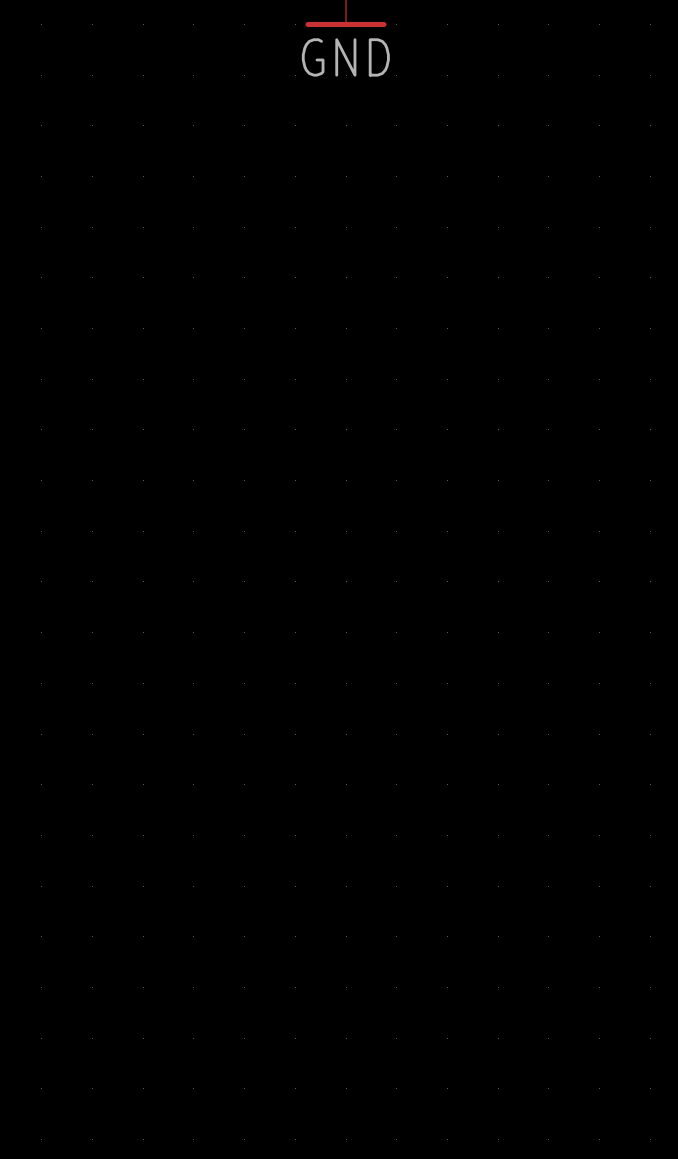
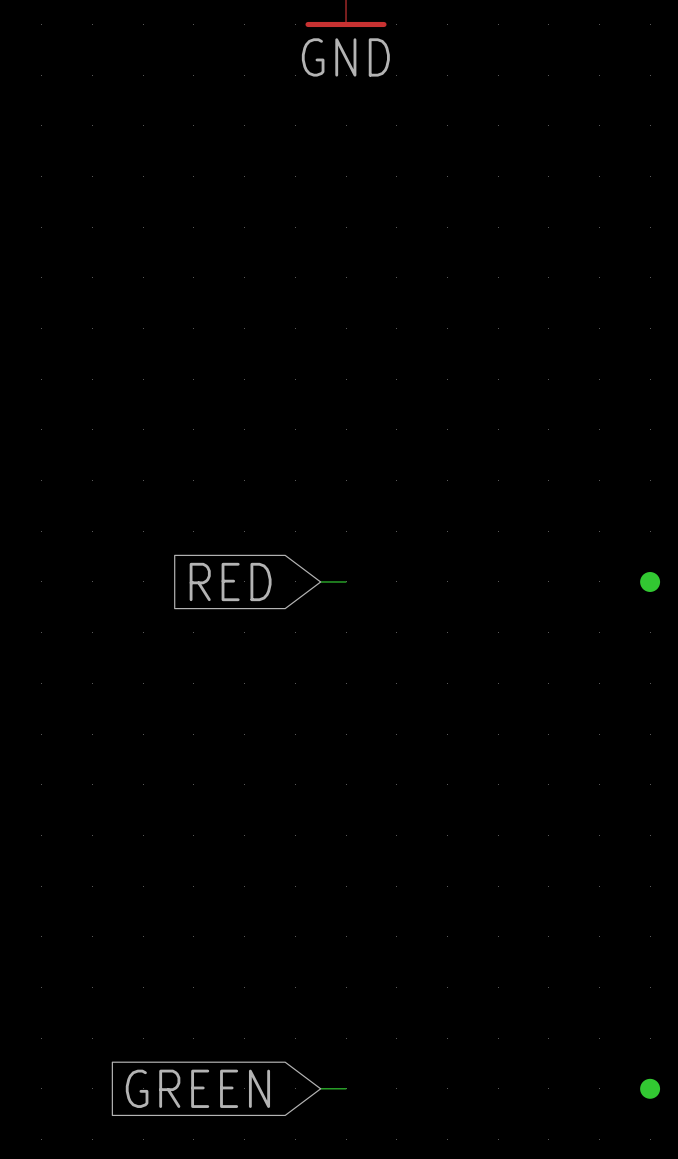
global label: none -> RED (230, 581)
wire: none -> (320, 581) (346, 581)
junction: none -> (650, 581)
global label: none -> GREEN (197, 1088)
wire: none -> (320, 1088) (346, 1088)
junction: none -> (650, 1088)

